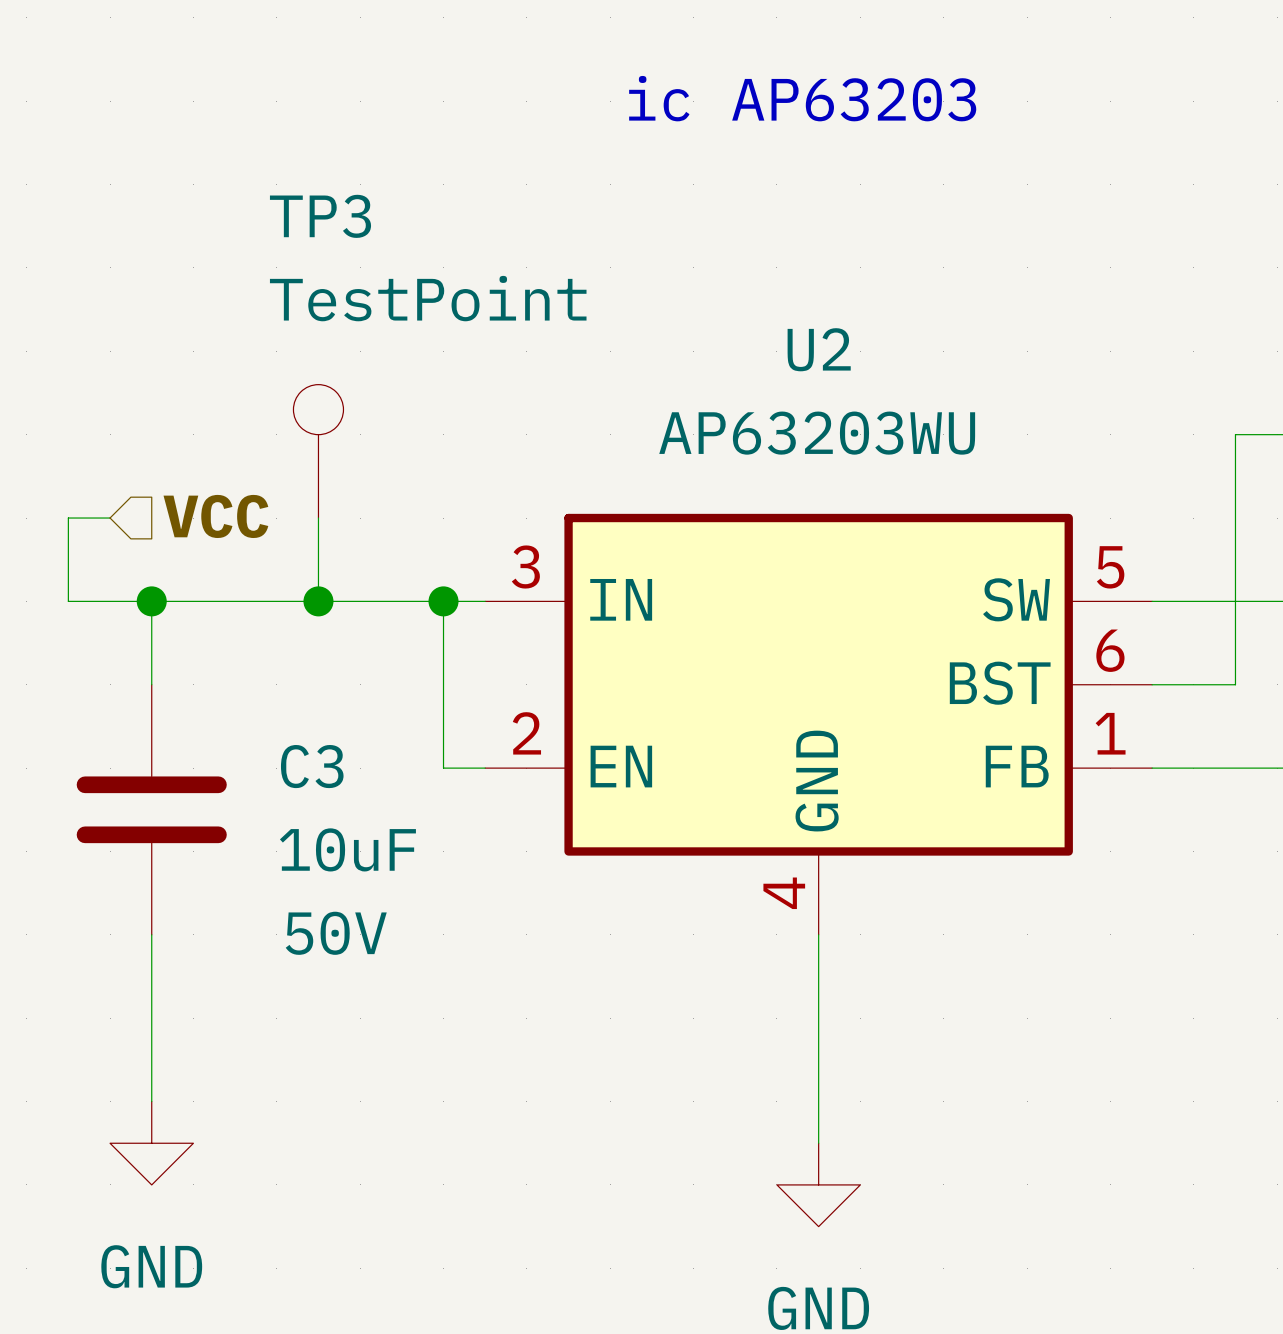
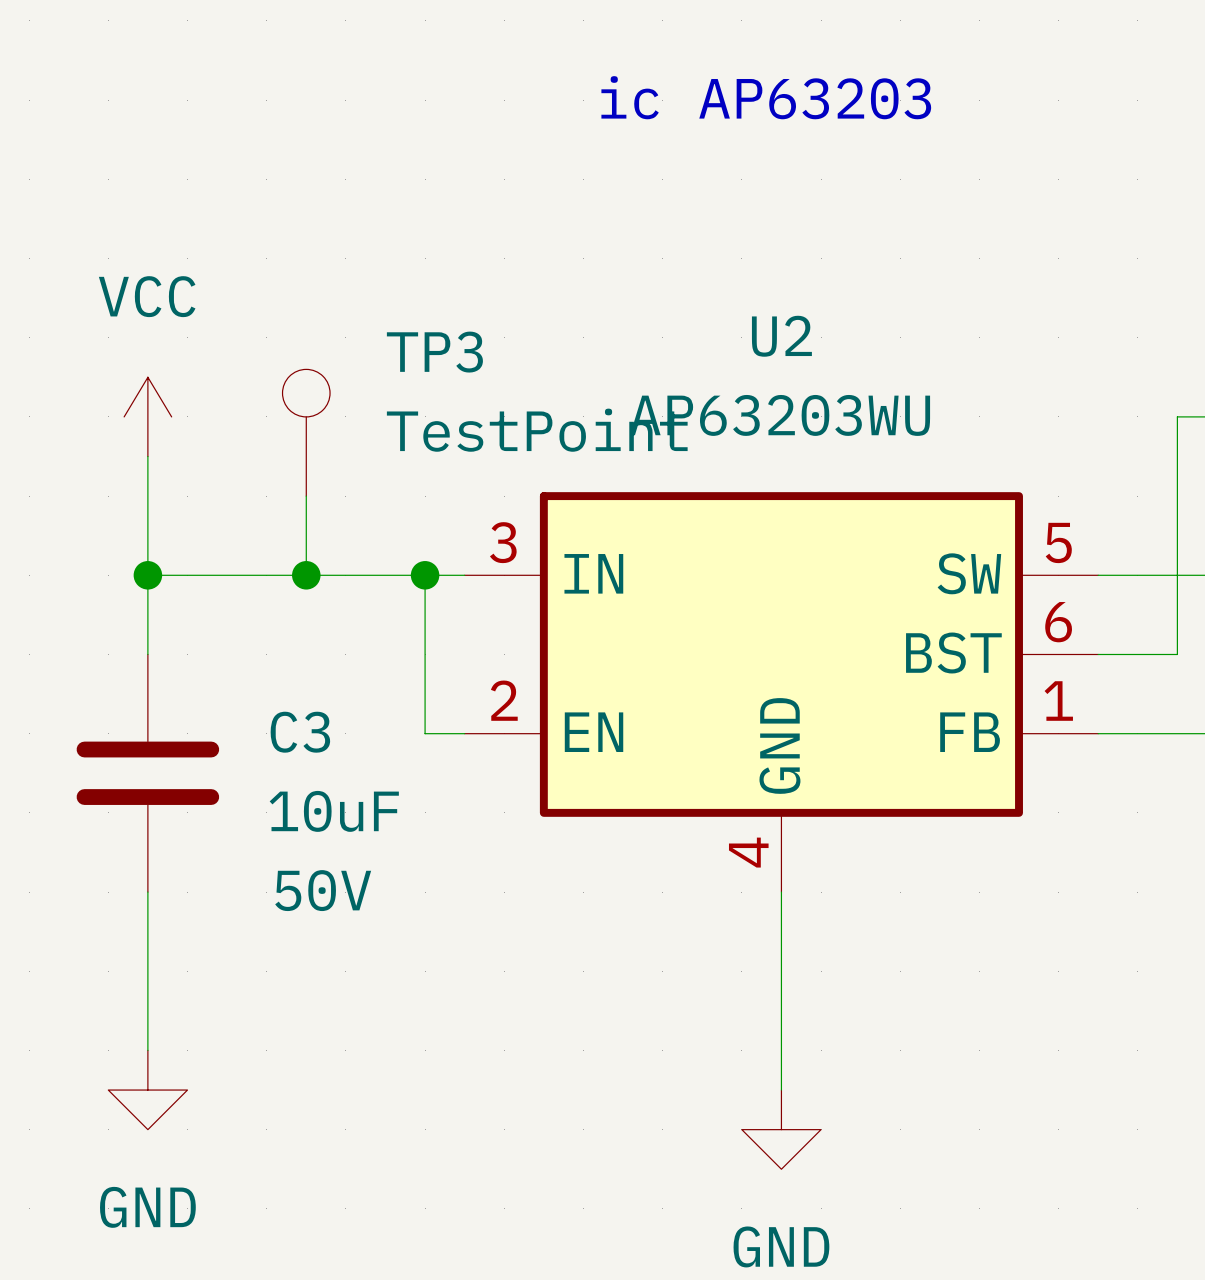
TP3 name position: TP3 (320, 216) -> TP3 (434, 352)
TP3 value position: TestPoint (428, 298) -> TestPoint (537, 430)
power symbol: none -> VCC (147, 416)
hierarchical label: VCC (215, 516) -> none
wire: (110, 518) (68, 518) (68, 601) (151, 601) -> (147, 456) (147, 575)

